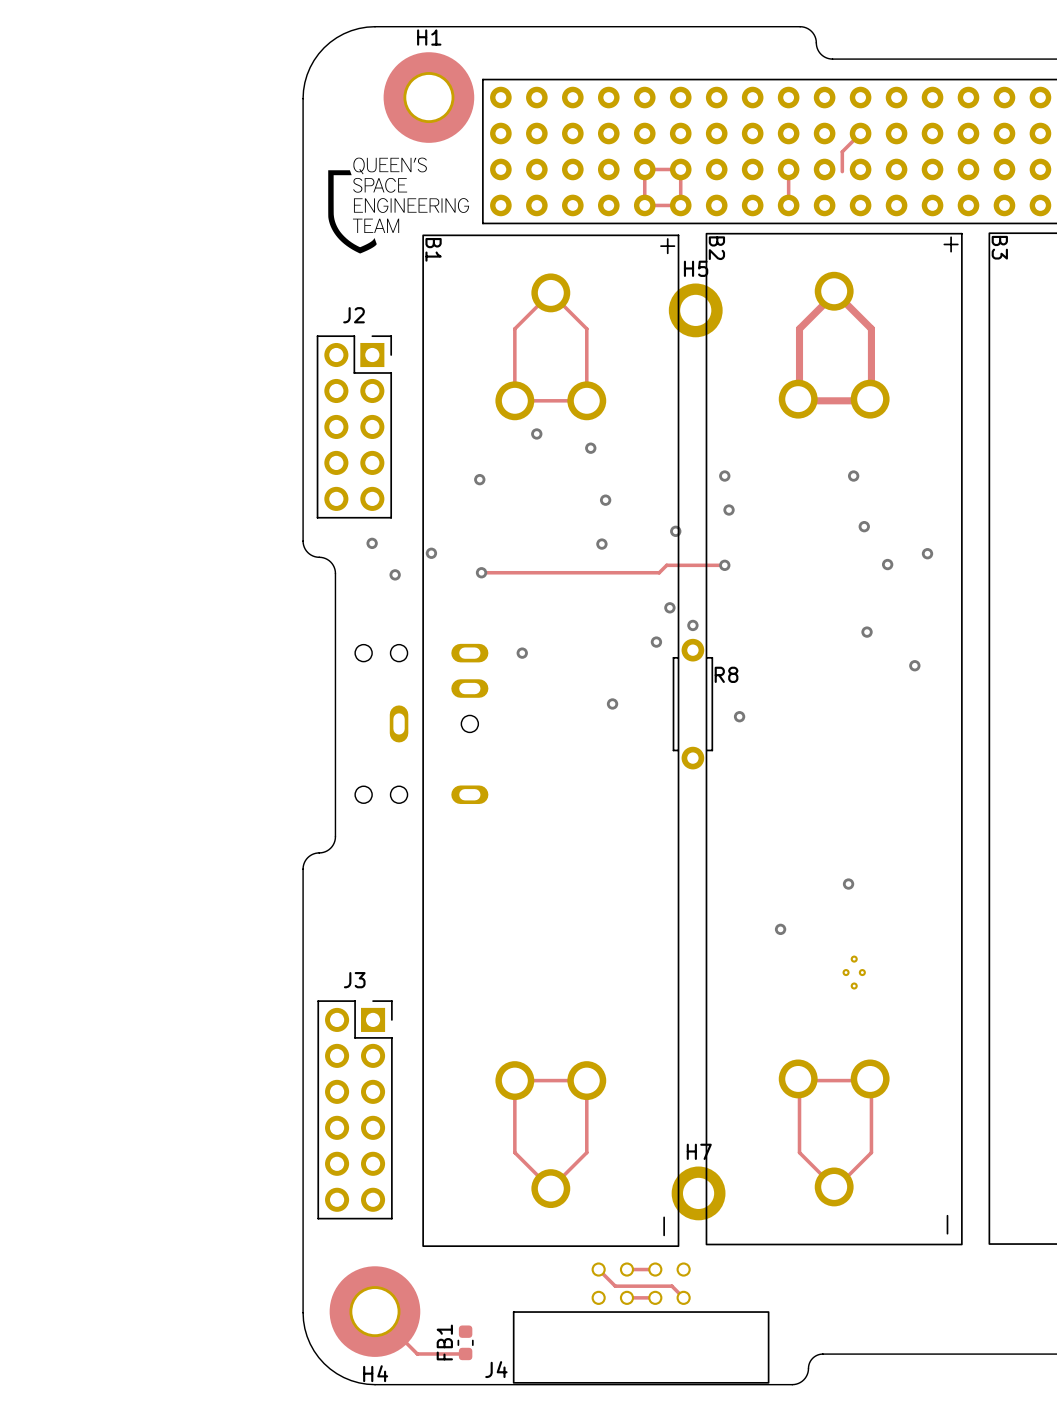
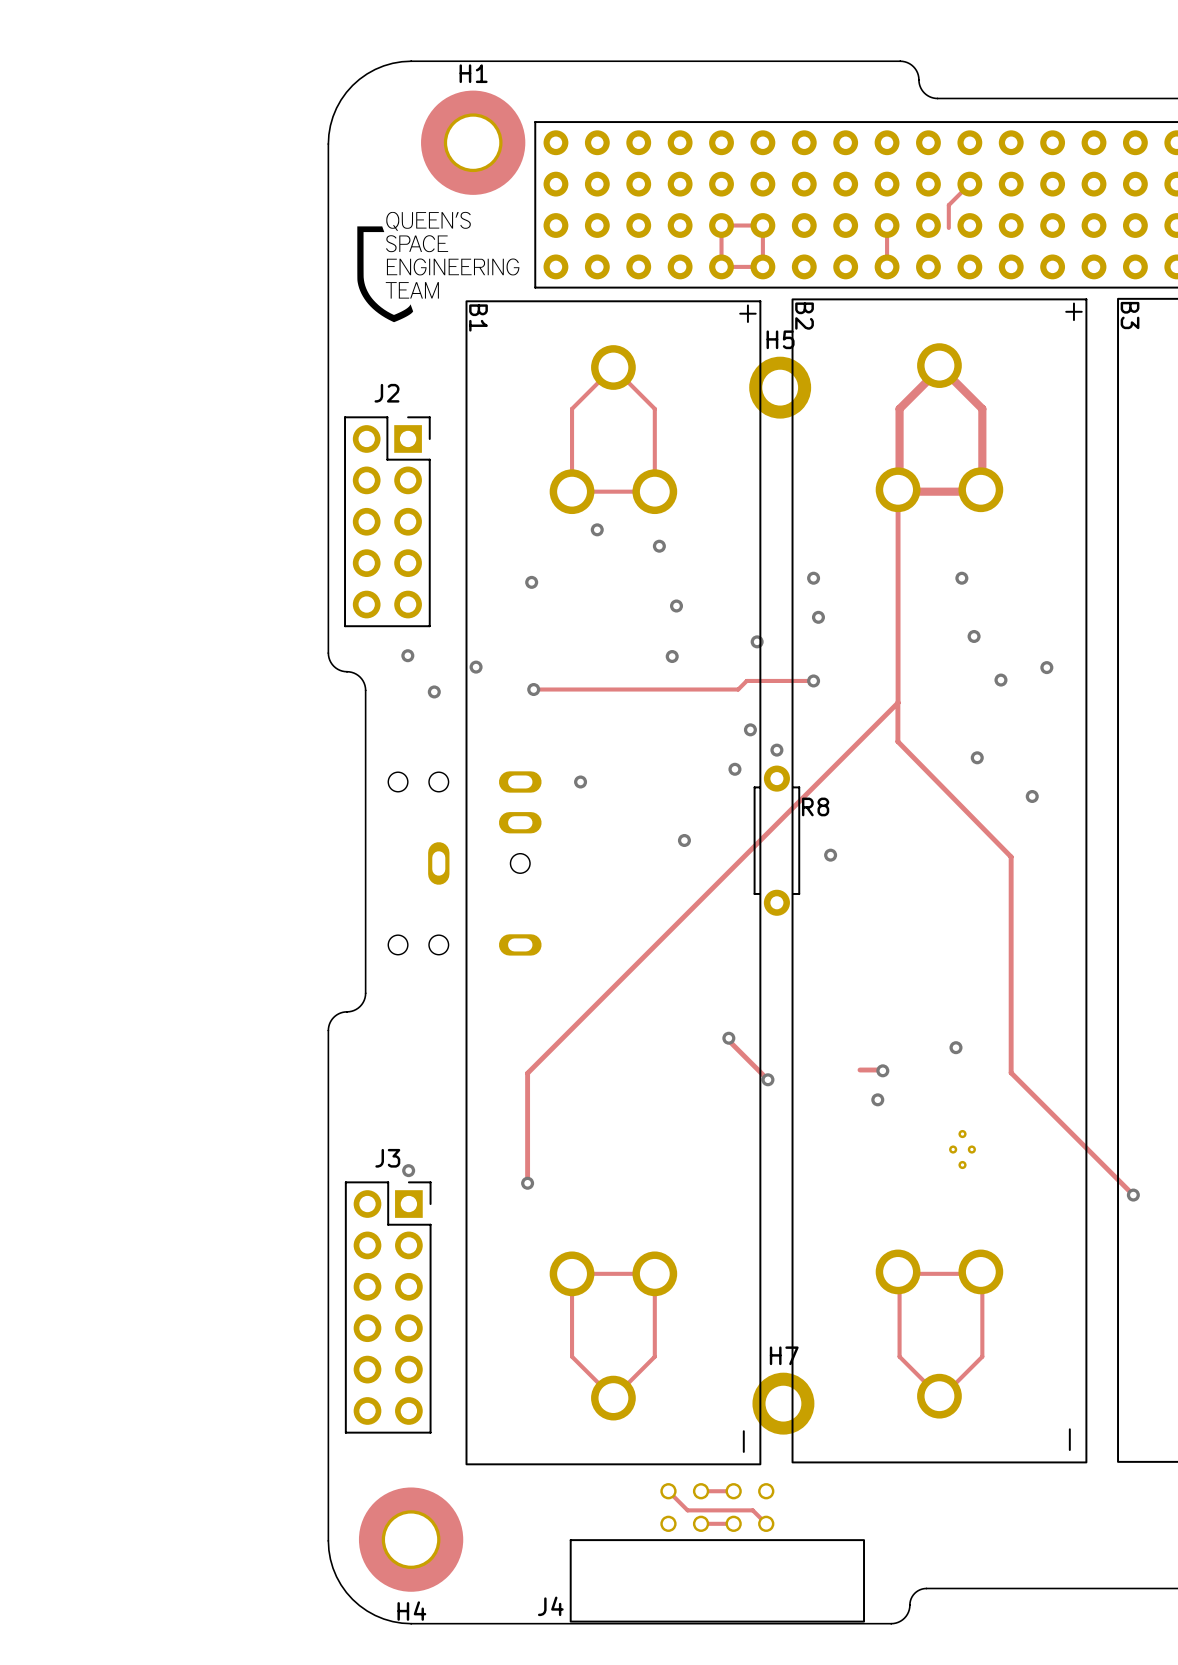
track: none -> (898, 489) (898, 702) (527, 1073) (527, 1183)
track: none -> (897, 702) (897, 741) (1011, 856) (1011, 1072) (1133, 1195)
track: none -> (728, 1038) (728, 1040) (767, 1079)
via: none -> (728, 1038)
track: none -> (860, 1070) (882, 1070)
via: none -> (882, 1070)
via: none -> (767, 1079)
via: none -> (408, 1170)
via: none -> (527, 1183)
via: none -> (1133, 1195)
track: (374, 1311) (417, 1353) (465, 1353) -> none
FB1: (465, 1342) -> none

